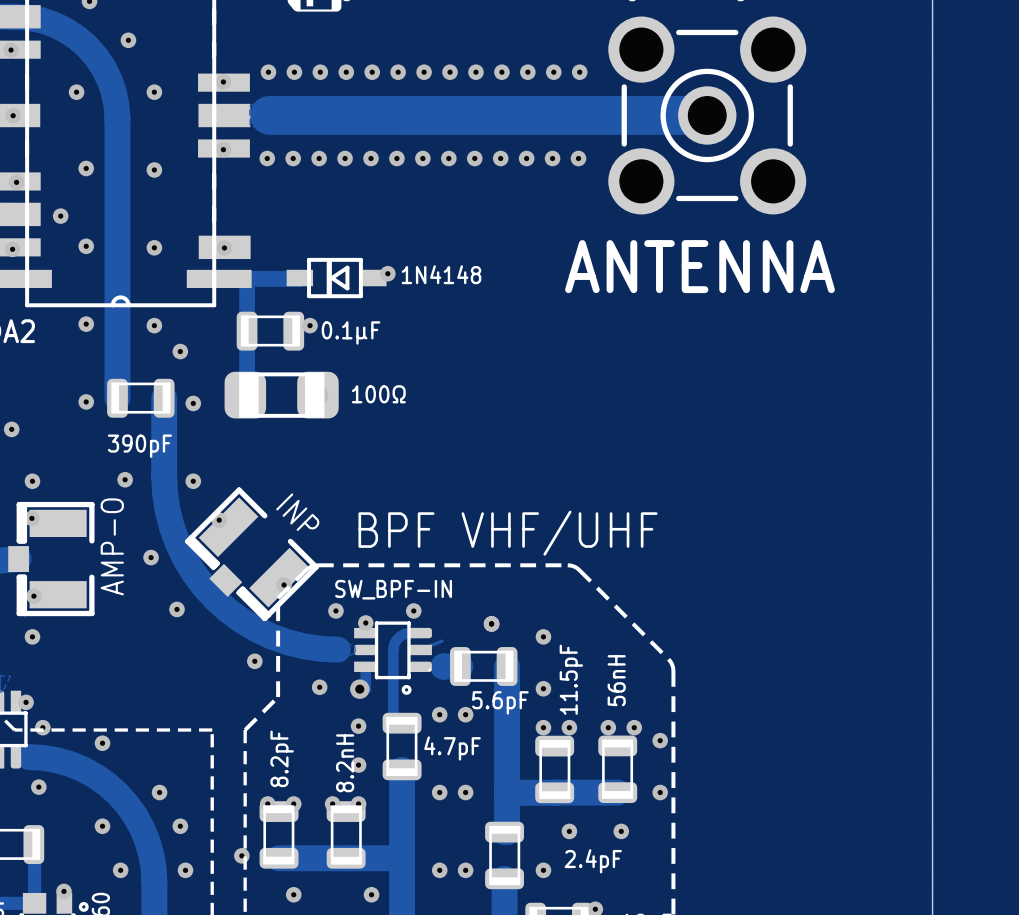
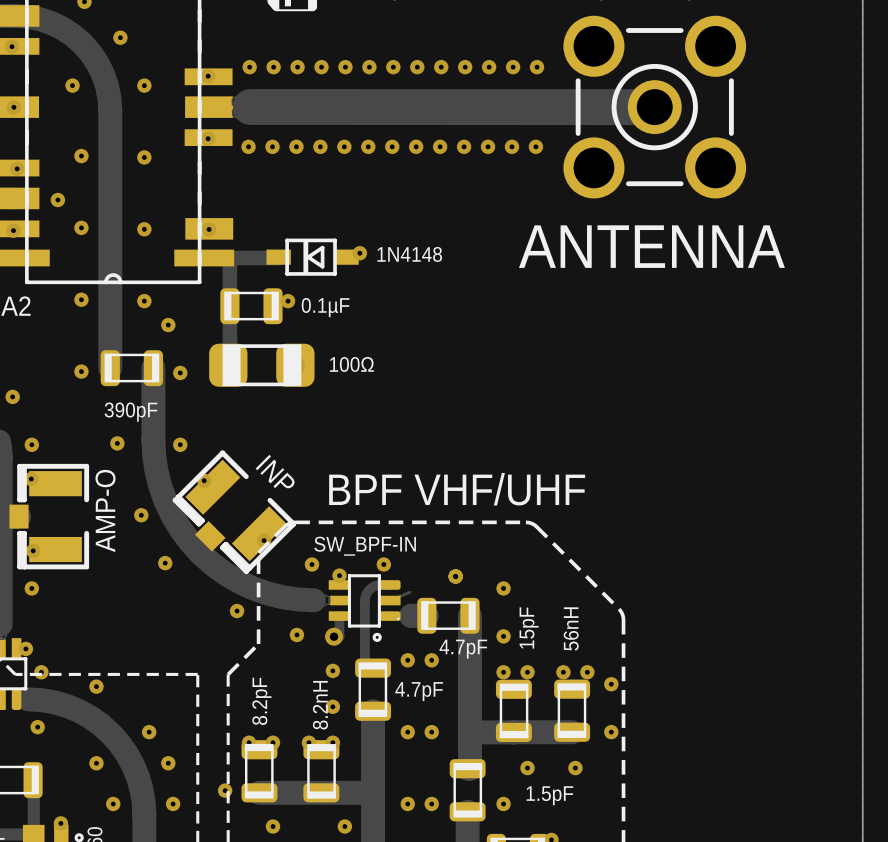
part value: 11.5pF (571, 679) -> 15pF (529, 627)
part value: 5.6pF (500, 702) -> 4.7pF (463, 649)
part value: 2.4pF (593, 861) -> 1.5pF (549, 795)

